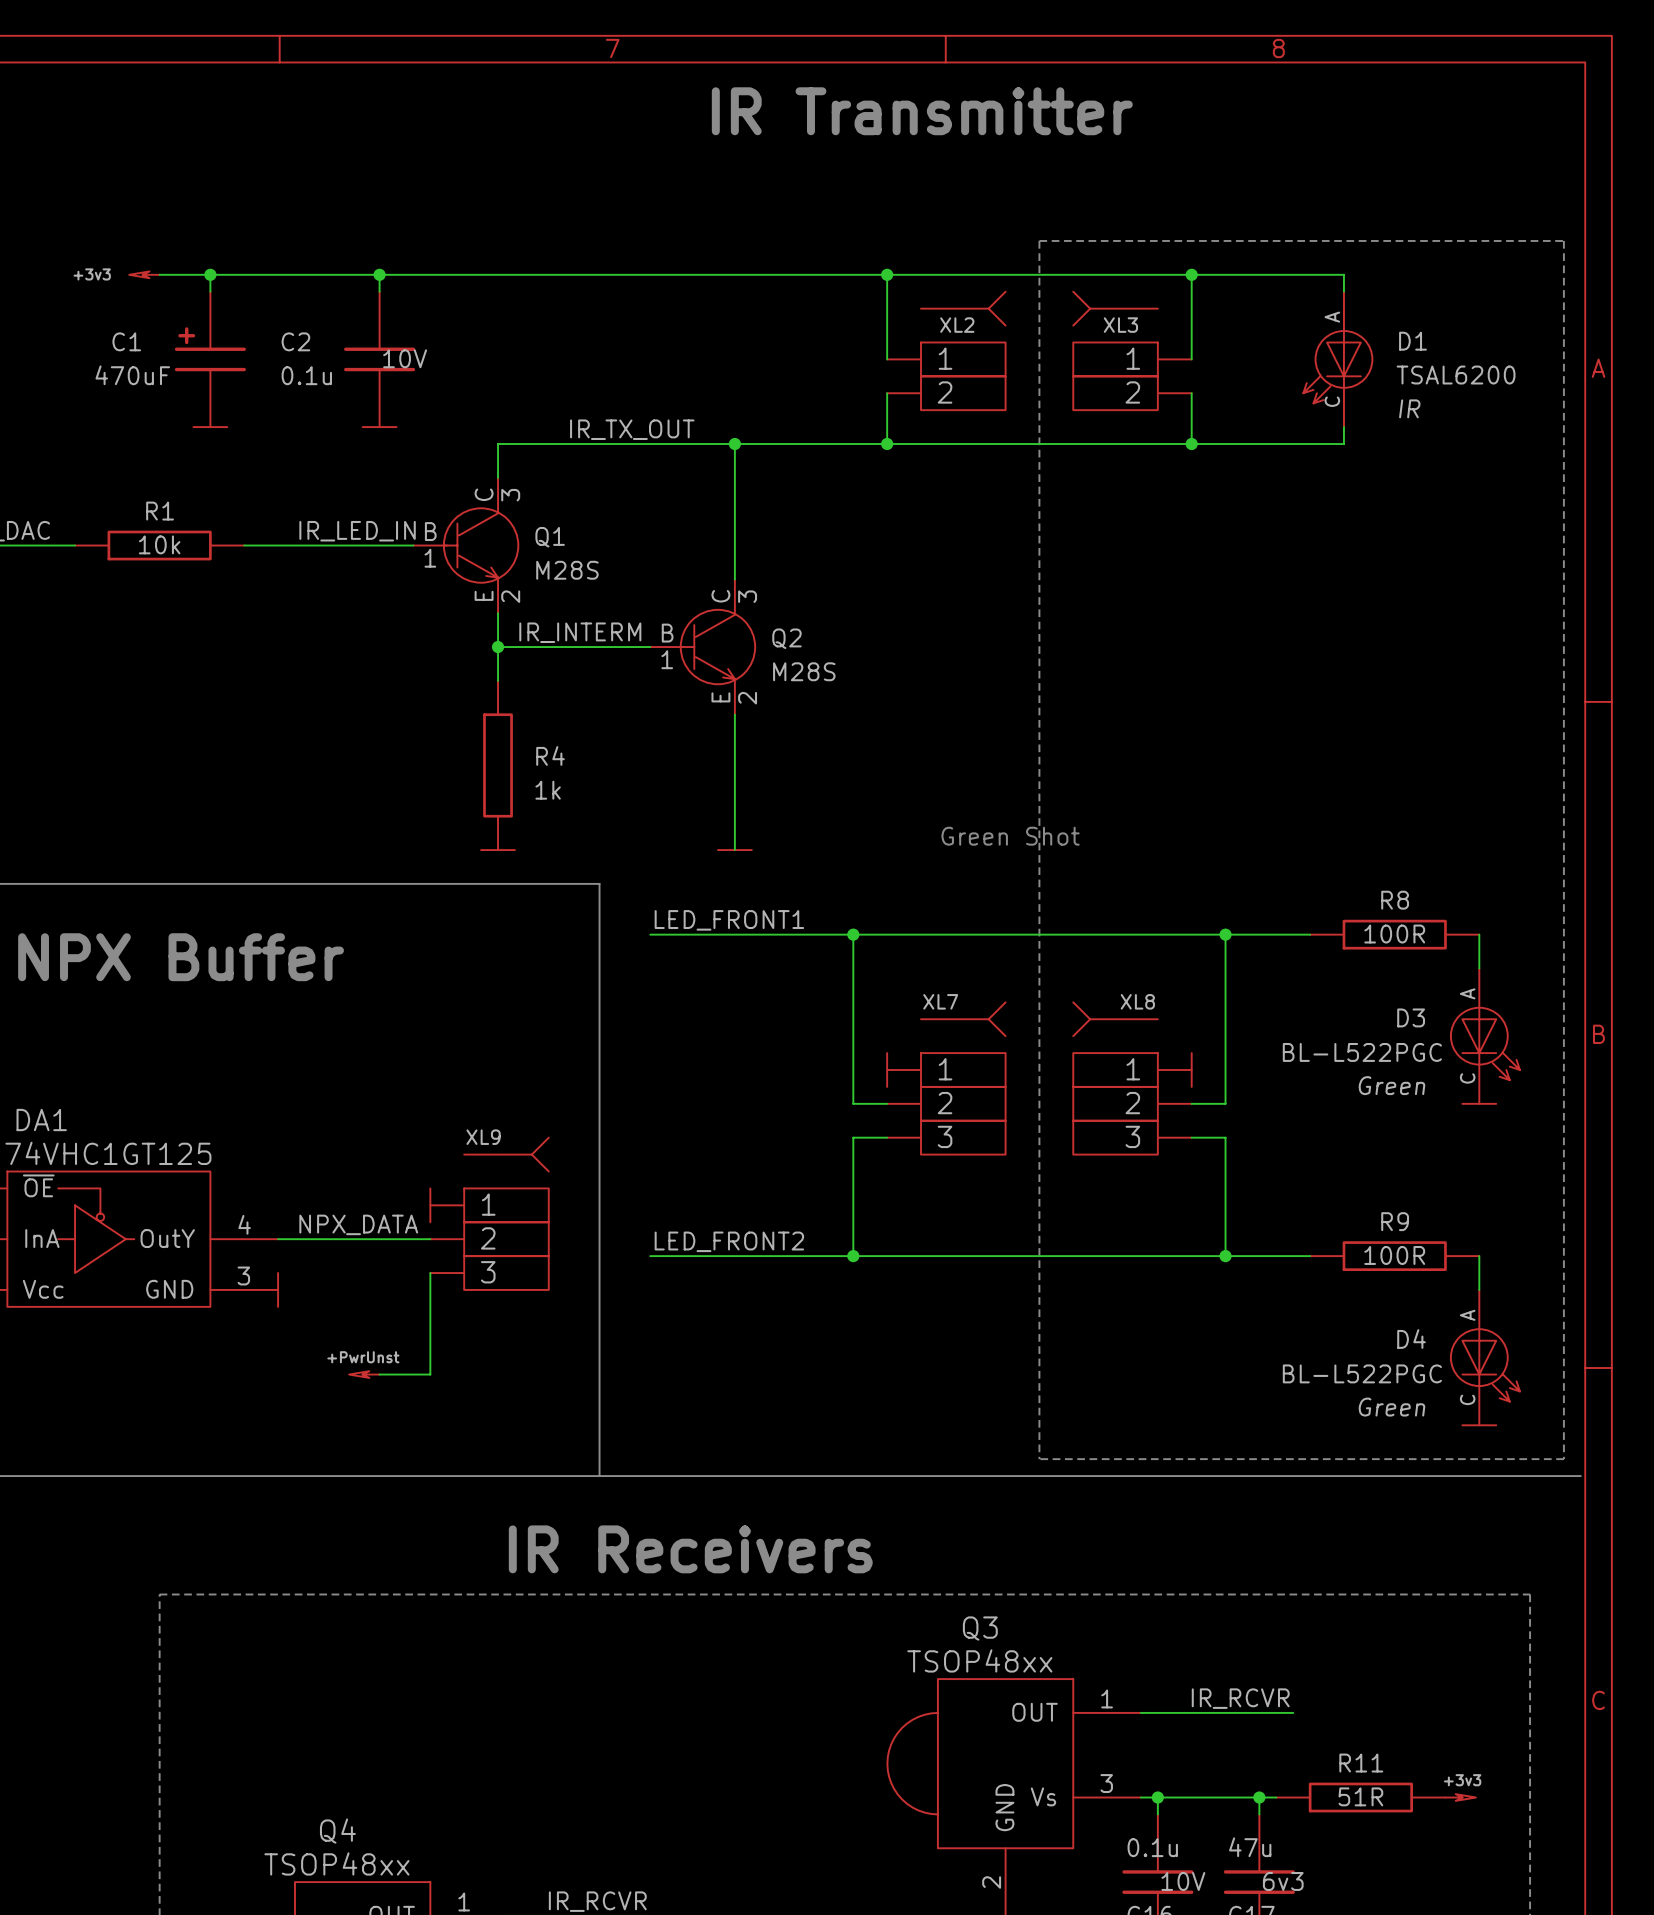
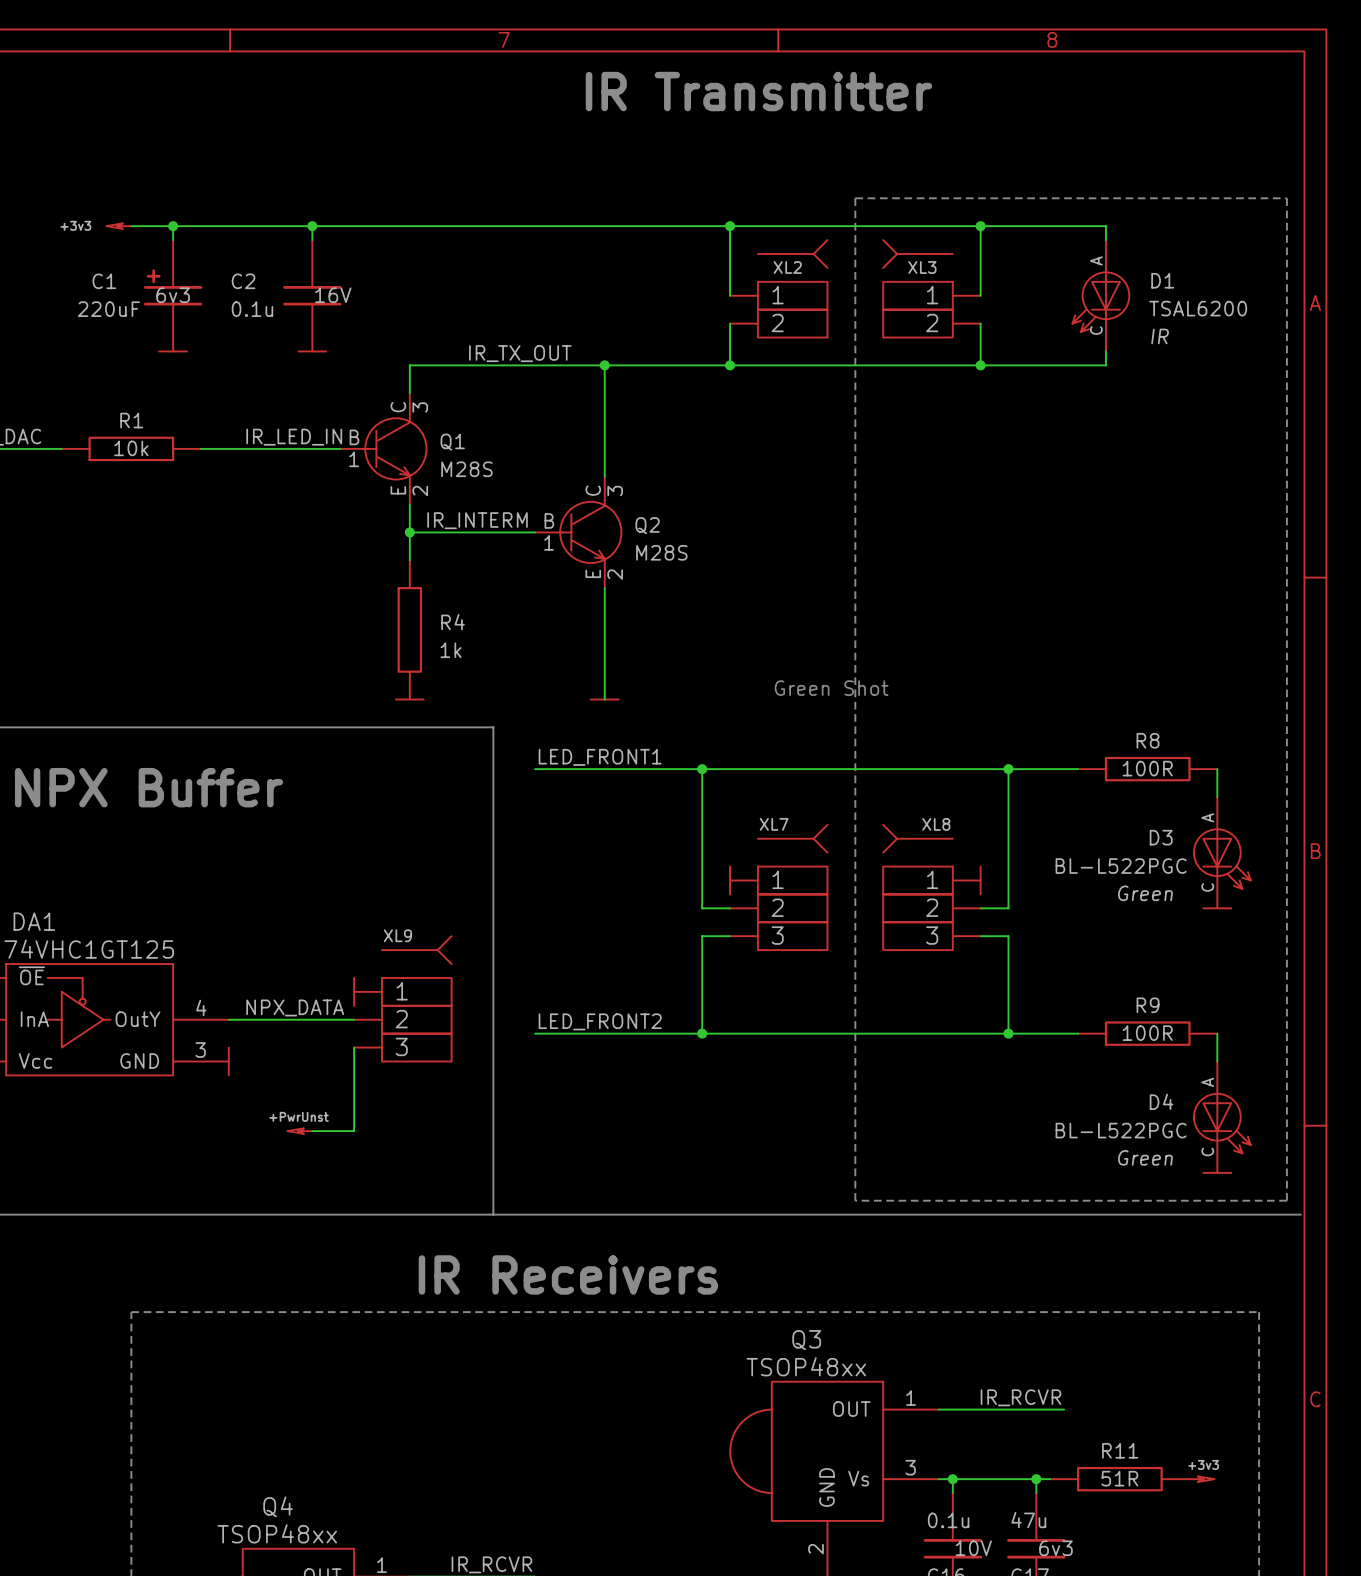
C1 text: none -> 6v3 (173, 295)
C2 text: 10V (405, 358) -> 16V (333, 295)
C1 value: 470uF (132, 375) -> 220uF (108, 309)

